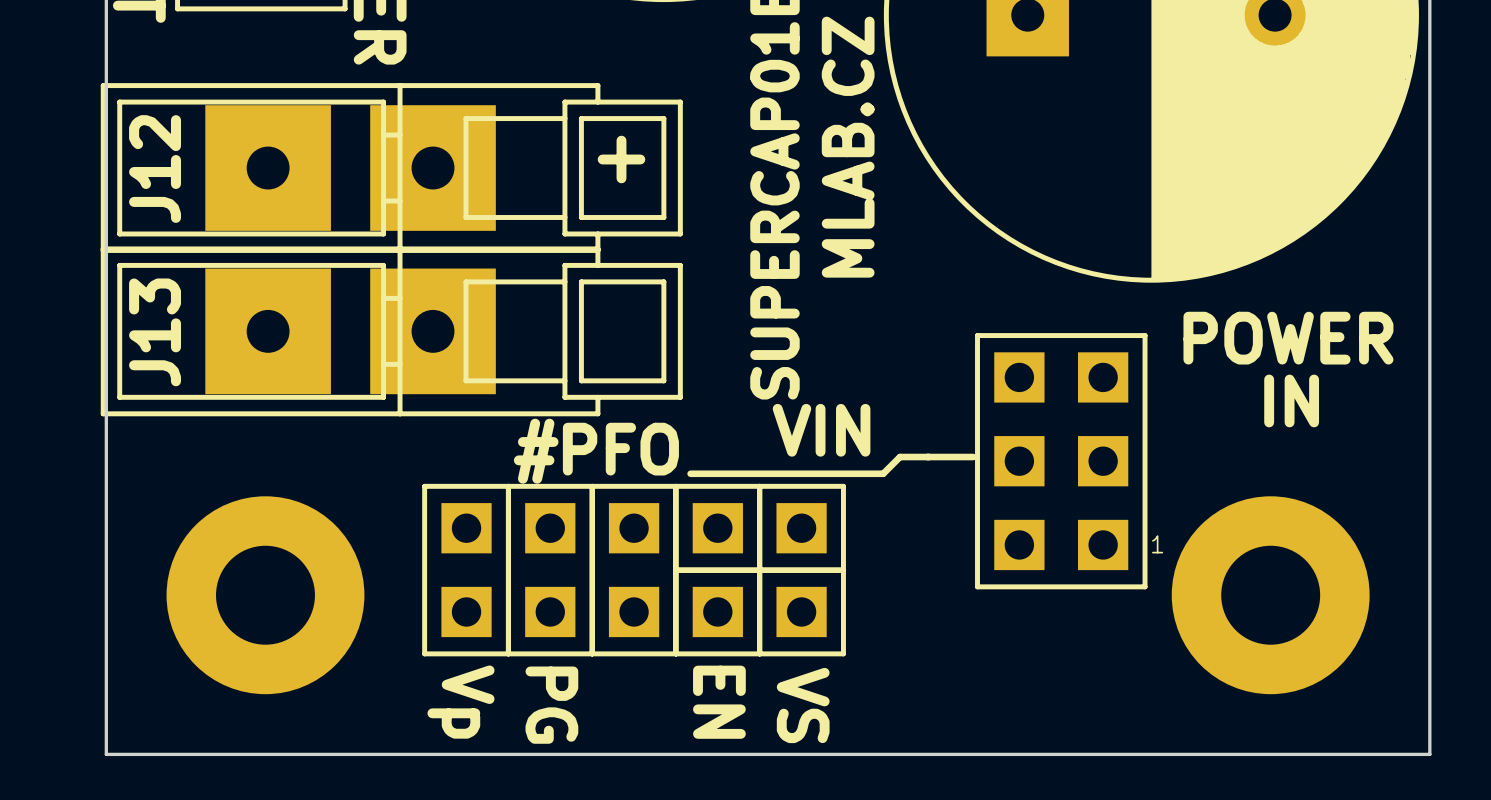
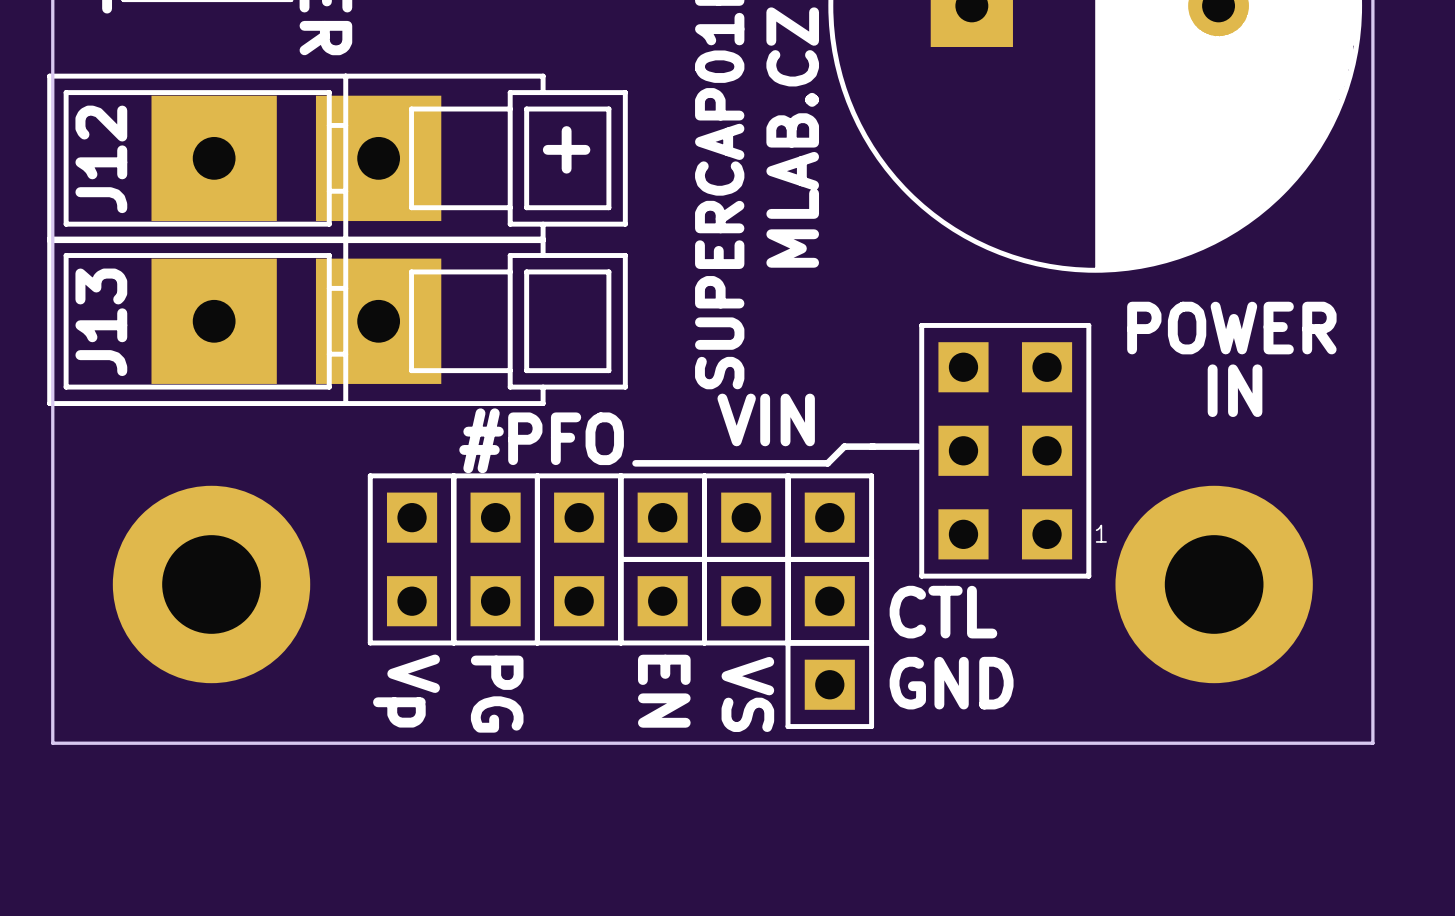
part: none -> (829, 517)
part: none -> (829, 601)
text: none -> CTL (943, 612)
text: none -> GND (951, 683)
part: none -> (829, 684)

